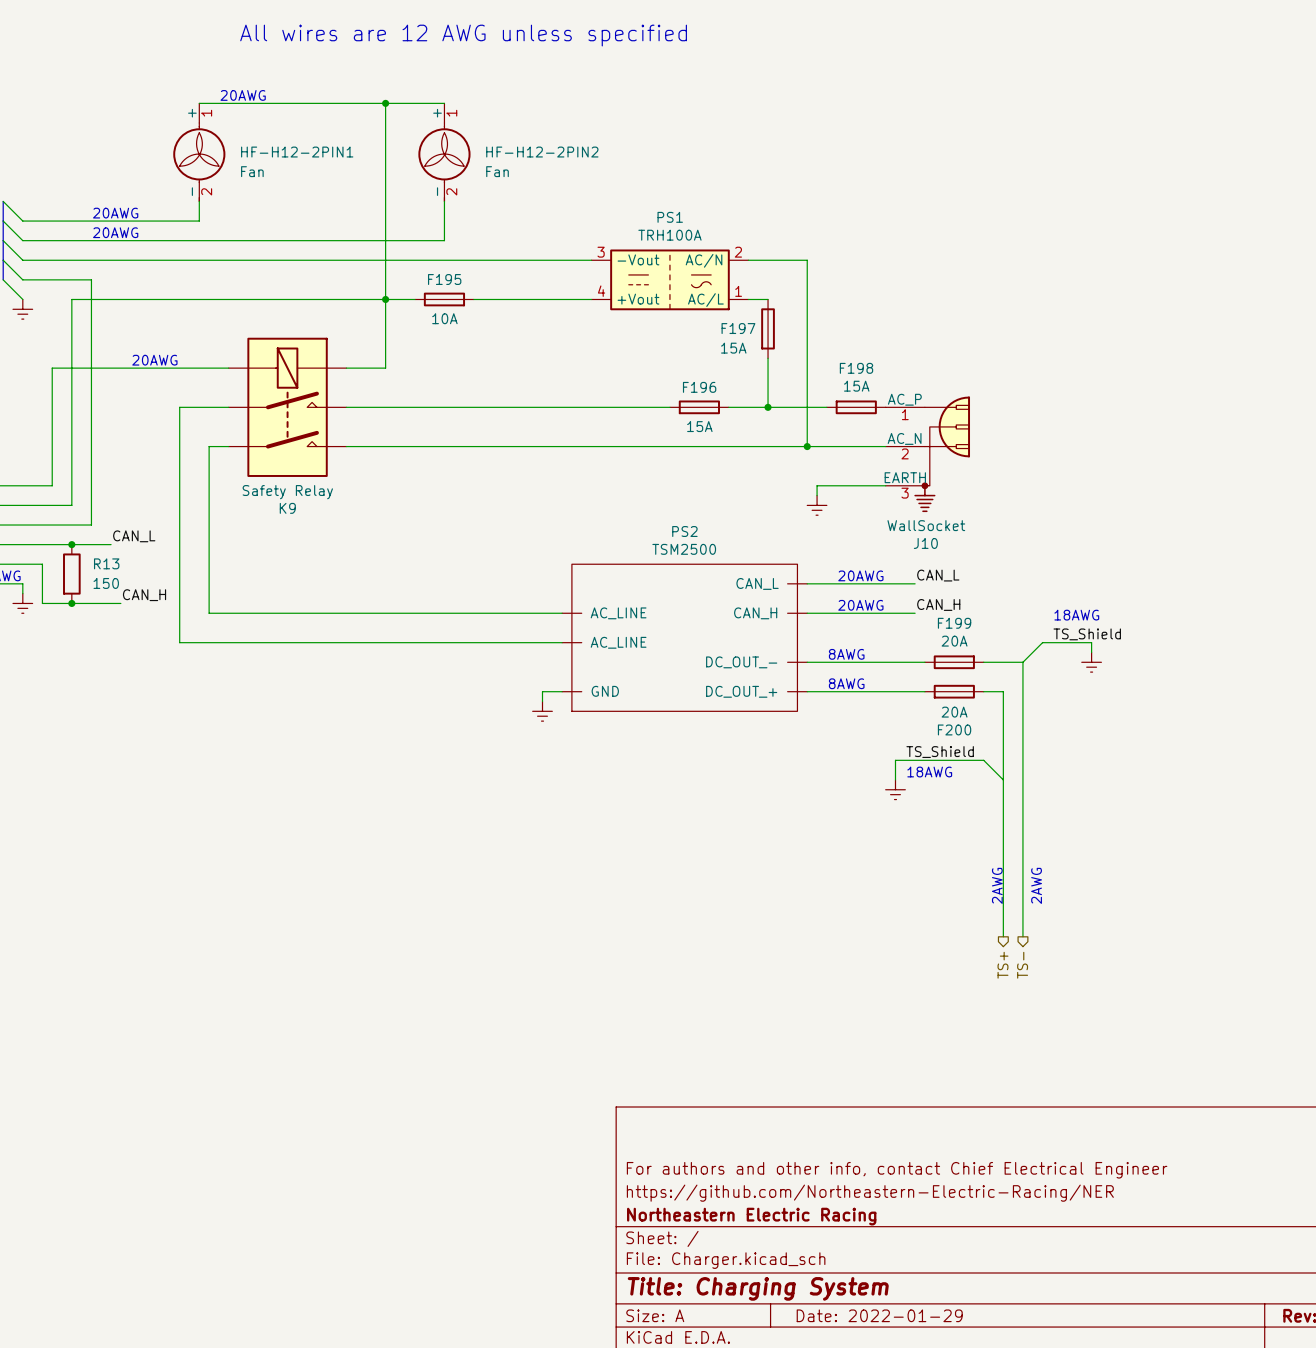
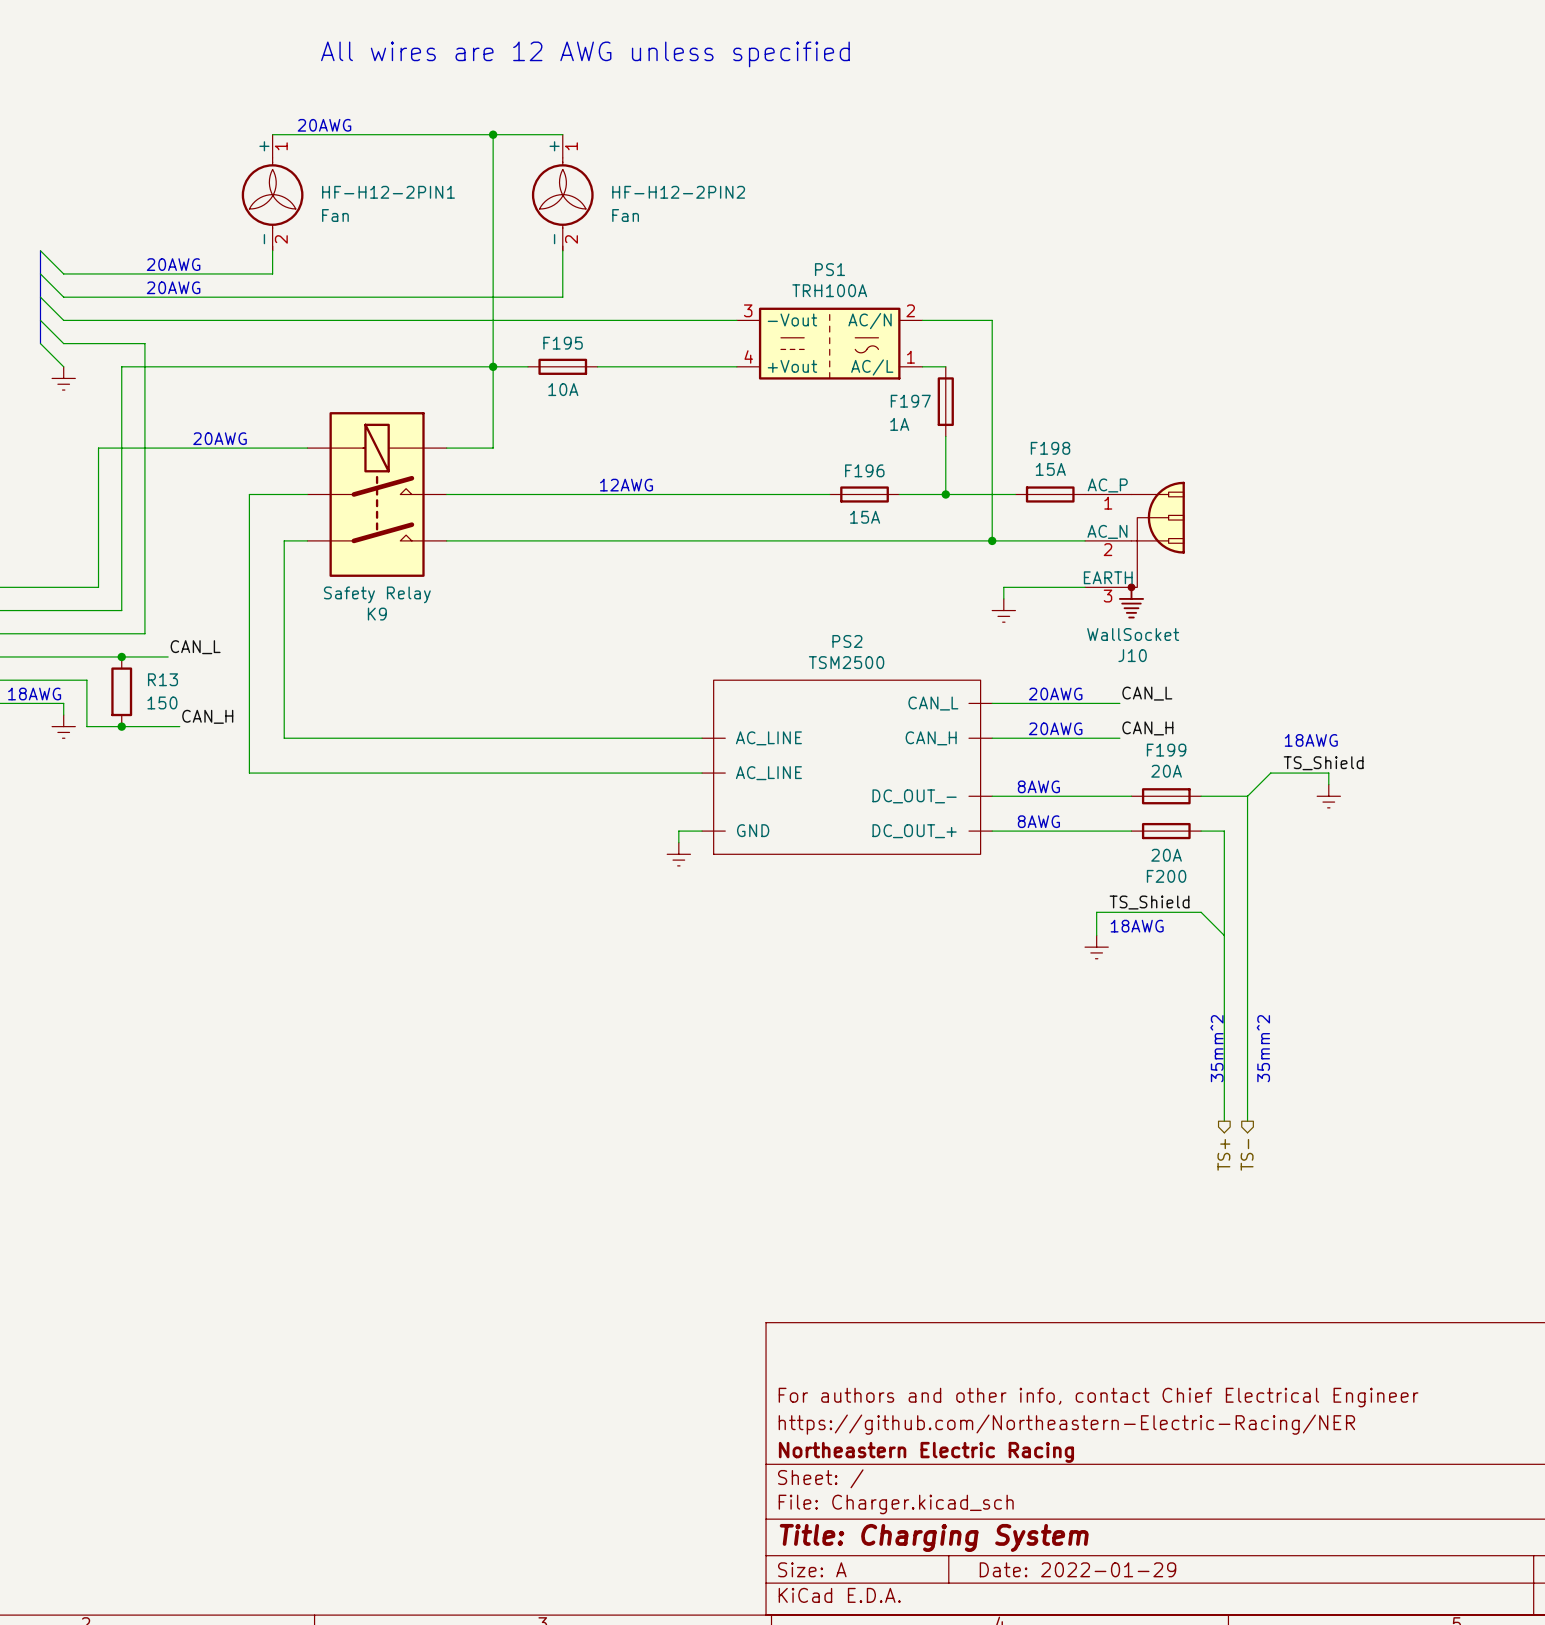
F197 value: 15A (733, 348) -> 1A (899, 424)
text: none -> 12AWG (626, 485)
text: 2AWG (997, 885) -> 35mm^2 (1216, 1048)
text: 2AWG (1036, 885) -> 35mm^2 (1263, 1048)

